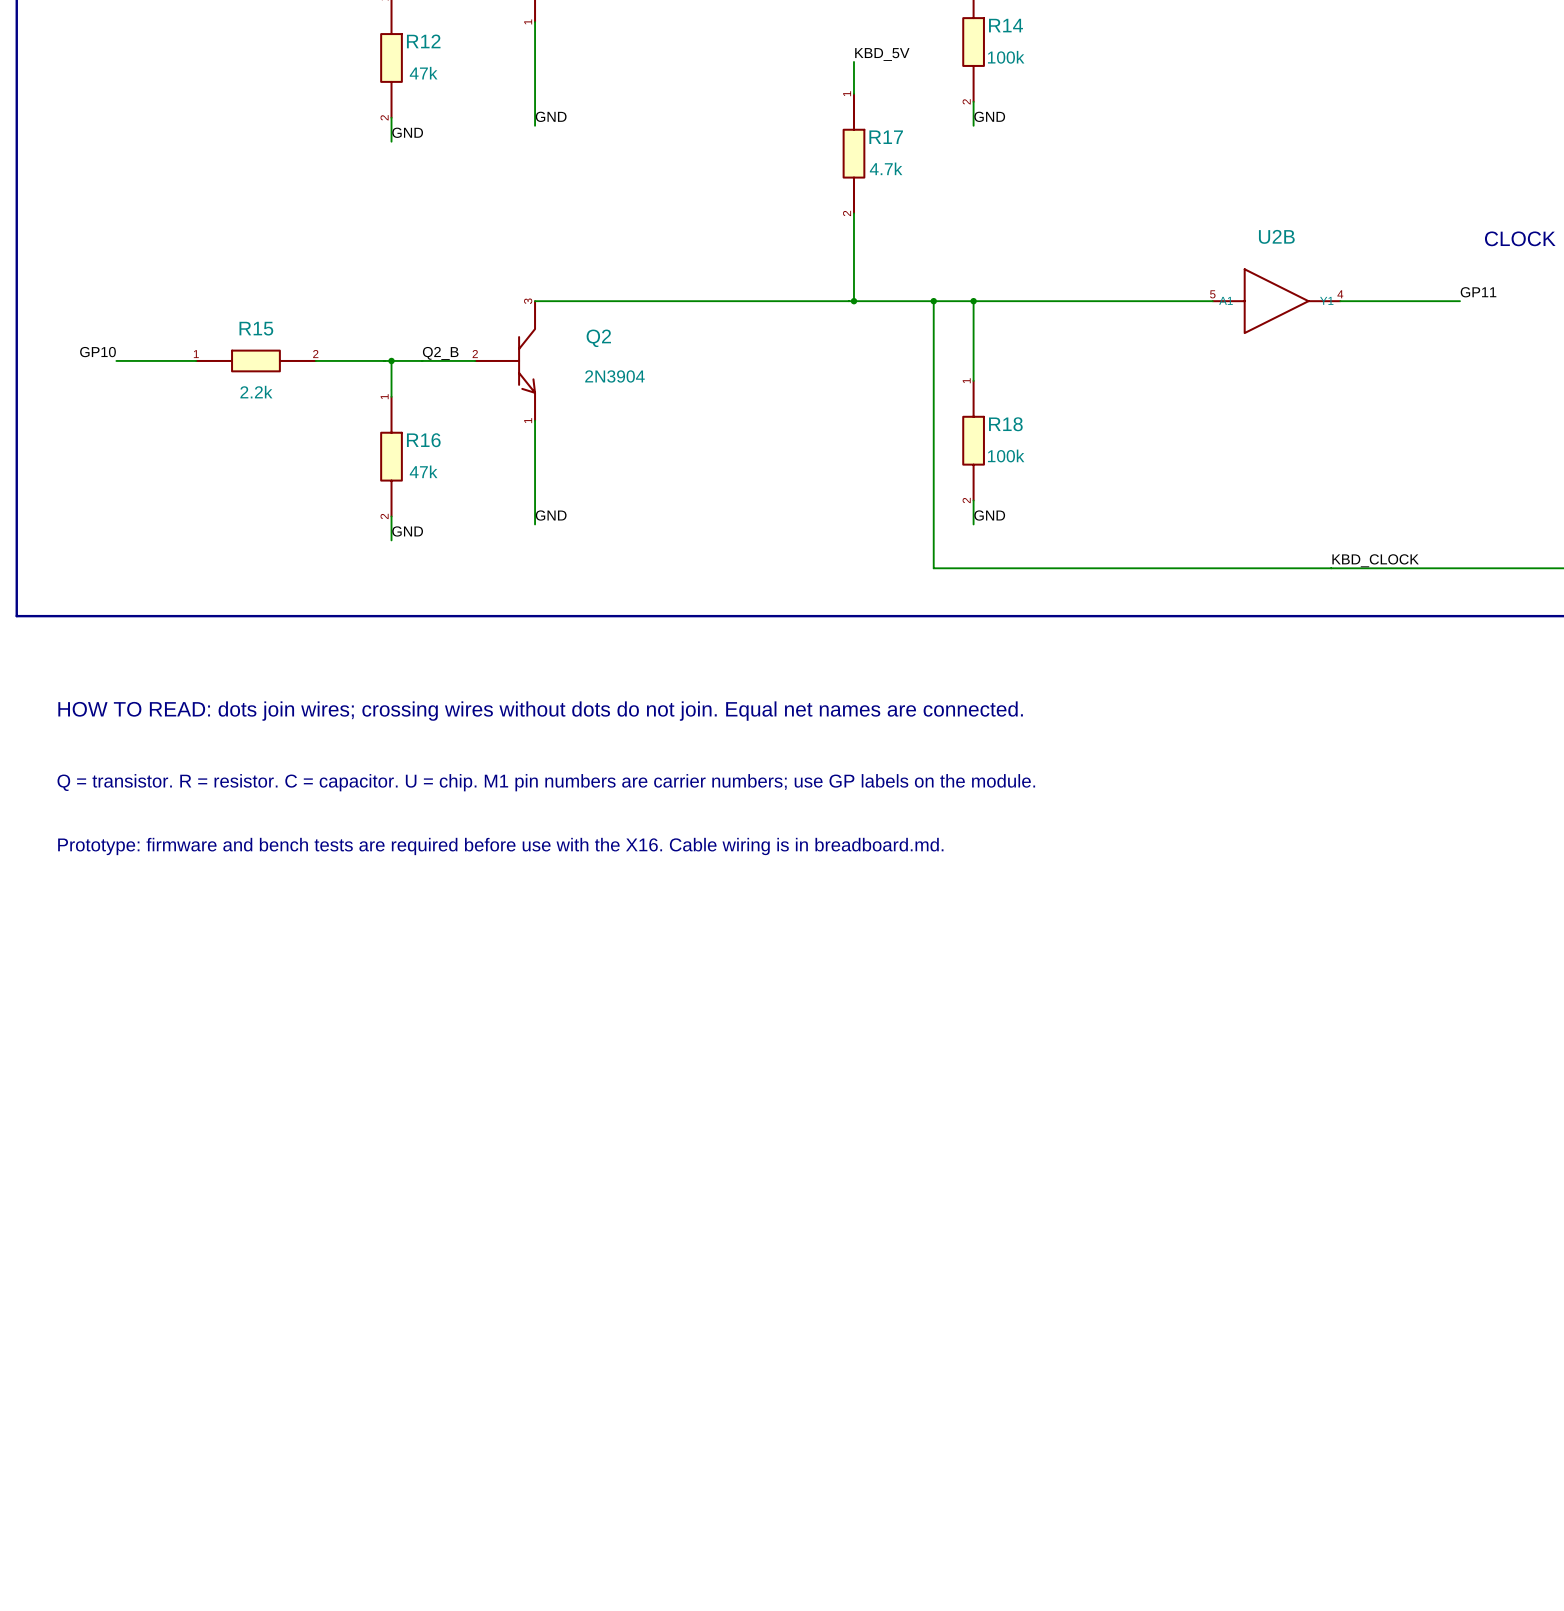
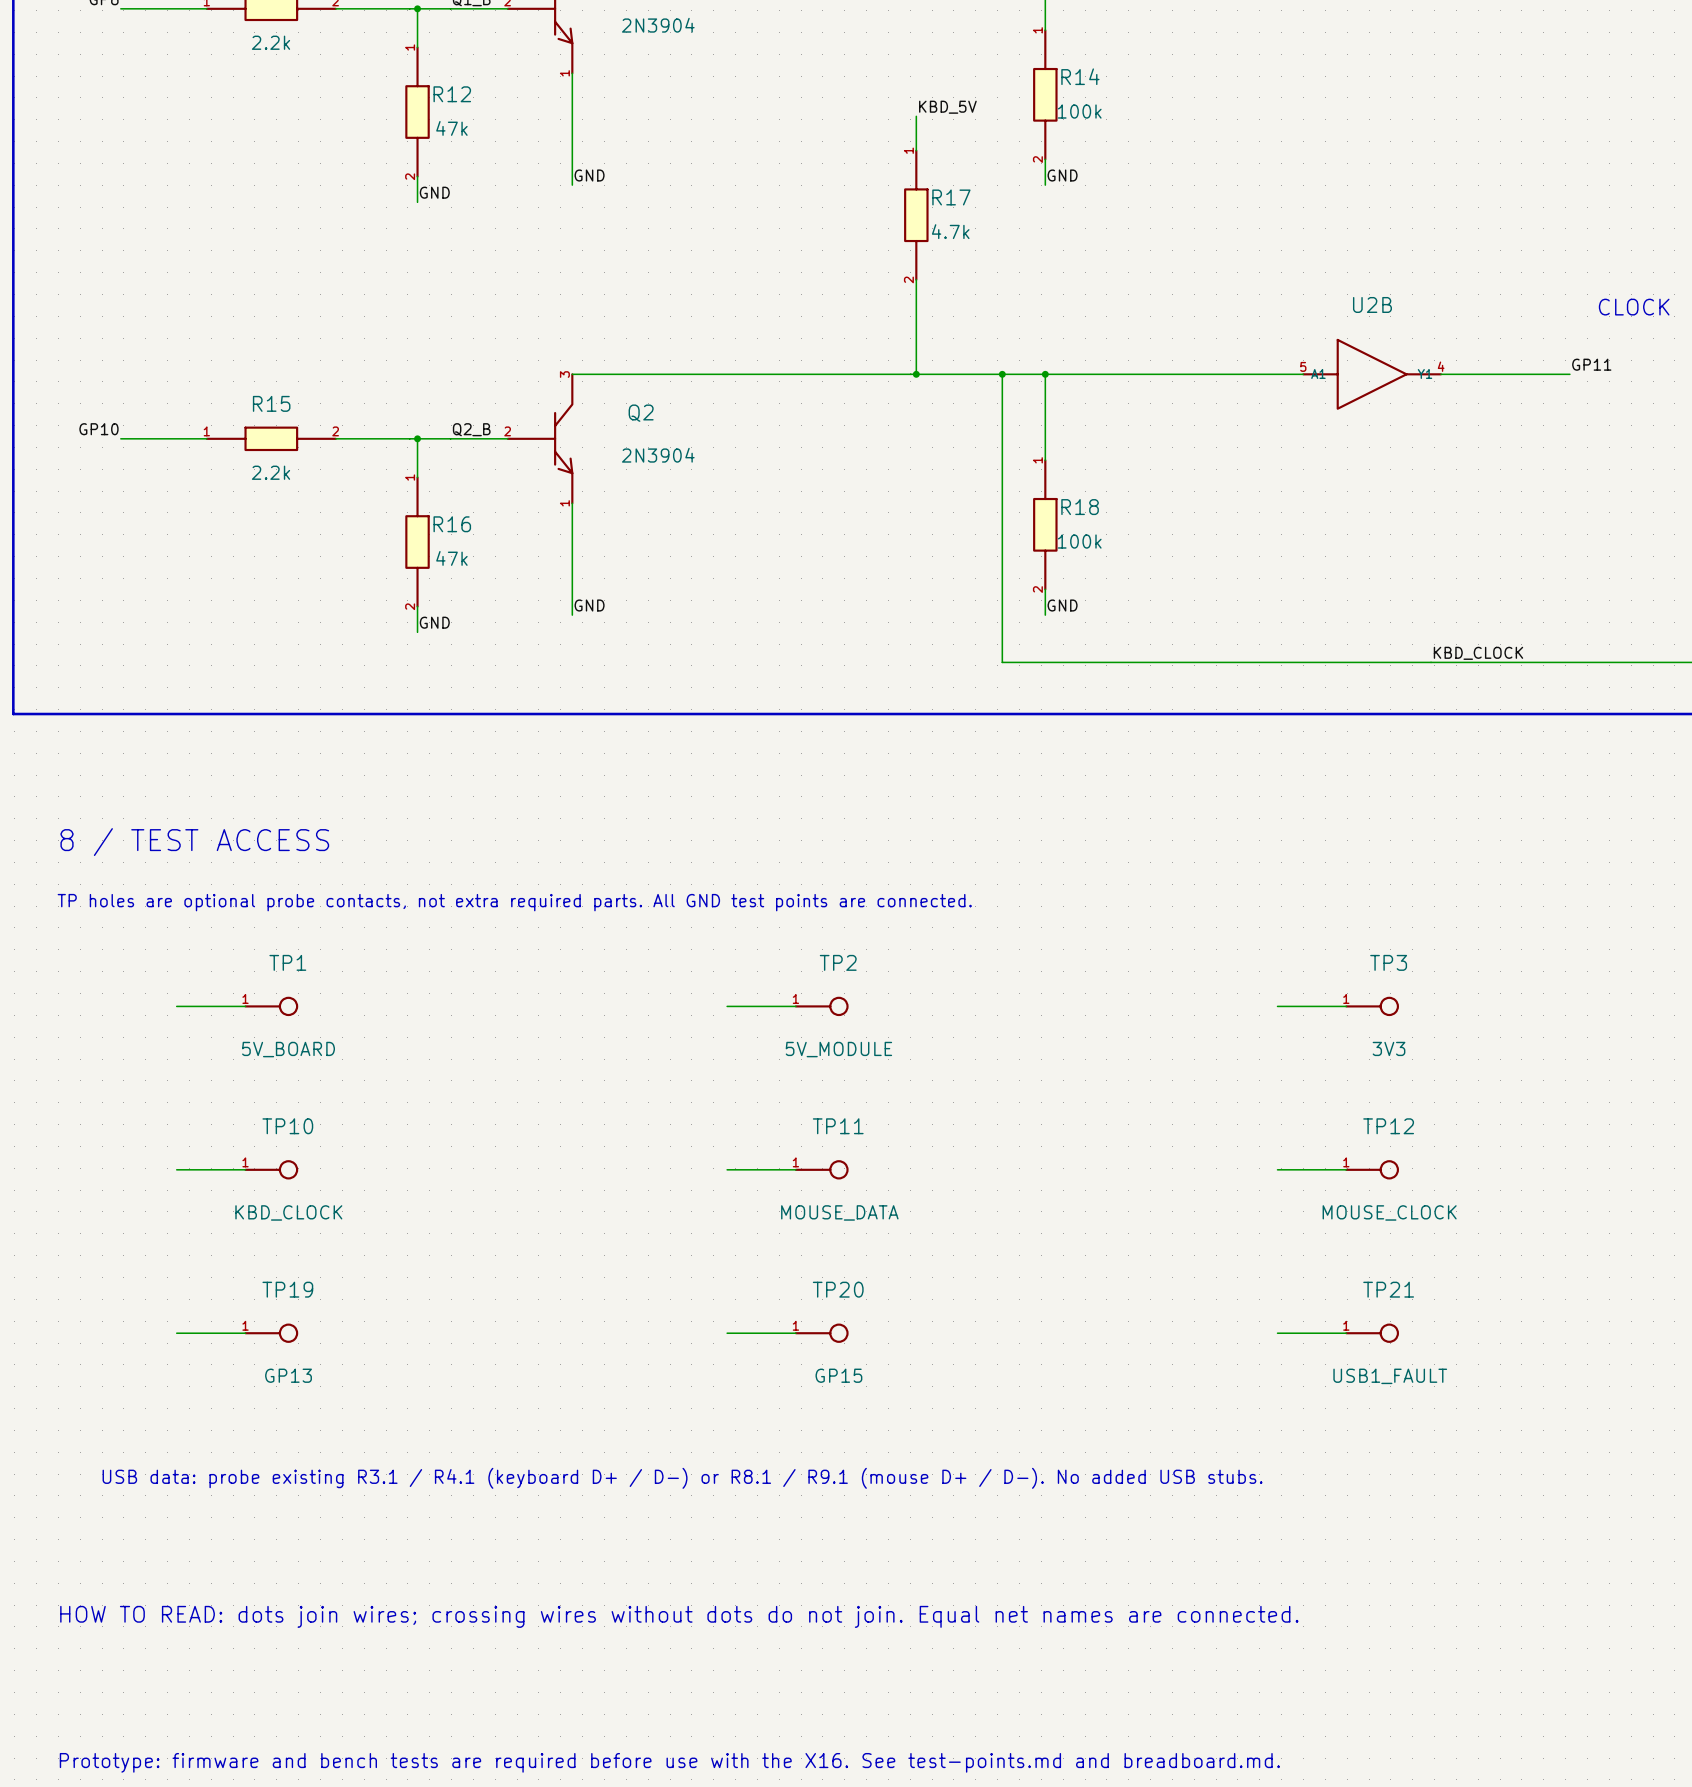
text: HOW TO READ: dots join wires; crossing wires without dots do not join. Equal net names are connected. (540, 711) -> none
text: none -> 8 / TEST ACCESS (194, 842)
text: Q = transistor. R = resistor. C = capacitor. U = chip. M1 pin numbers are carrier numbers; use GP labels on the module. (546, 782) -> TP holes are optional probe contacts, not extra required parts. All GND test points are connected. (514, 902)
text: Prototype: firmware and bench tests are required before use with the X16. Cable wiring is in breadboard.md. (500, 846) -> none
wire: none -> (176, 1006) (245, 1006)
TP1: none -> 5V_BOARD (271, 1006)
wire: none -> (727, 1006) (795, 1006)
TP2: none -> 5V_MODULE (821, 1006)
wire: none -> (1277, 1006) (1346, 1006)
TP3: none -> 3V3 (1372, 1006)
wire: none -> (176, 1169) (245, 1169)
TP10: none -> KBD_CLOCK (271, 1169)
wire: none -> (727, 1169) (795, 1169)
TP11: none -> MOUSE_DATA (821, 1169)
wire: none -> (1277, 1169) (1346, 1169)
TP12: none -> MOUSE_CLOCK (1372, 1169)
wire: none -> (176, 1333) (245, 1333)
TP19: none -> GP13 (271, 1333)
wire: none -> (727, 1333) (795, 1333)
TP20: none -> GP15 (821, 1333)
wire: none -> (1277, 1333) (1346, 1333)
TP21: none -> USB1_FAULT (1372, 1333)
text: none -> USB data: probe existing R3.1 / R4.1 (keyboard D+ / D-) or R8.1 / R9.1 (mouse D+ / D-). No added USB stubs. (682, 1478)
text: none -> HOW TO READ: dots join wires; crossing wires without dots do not join. Equal net names are connected. (679, 1616)
text: none -> Prototype: firmware and bench tests are required before use with the X16. See test-points.md and breadboard.md. (669, 1762)

